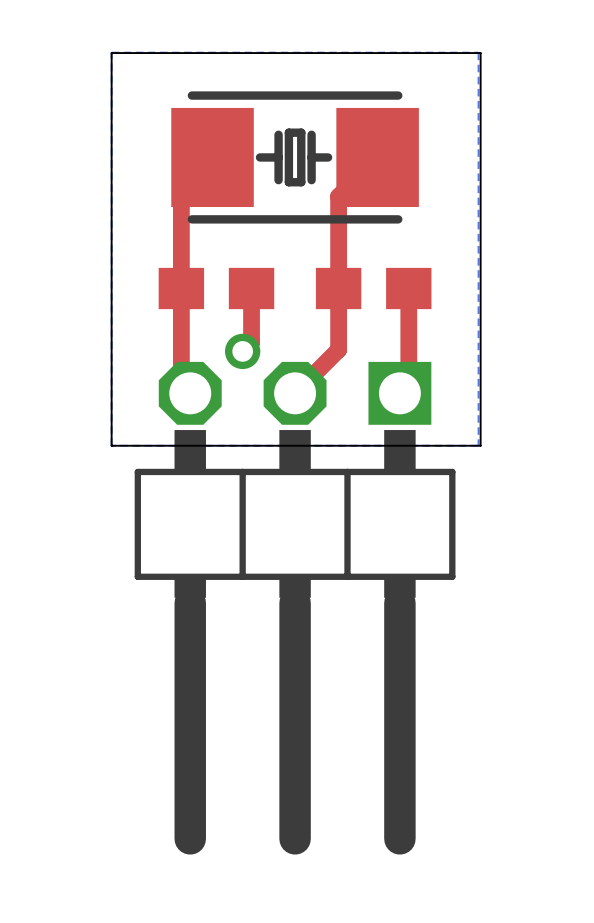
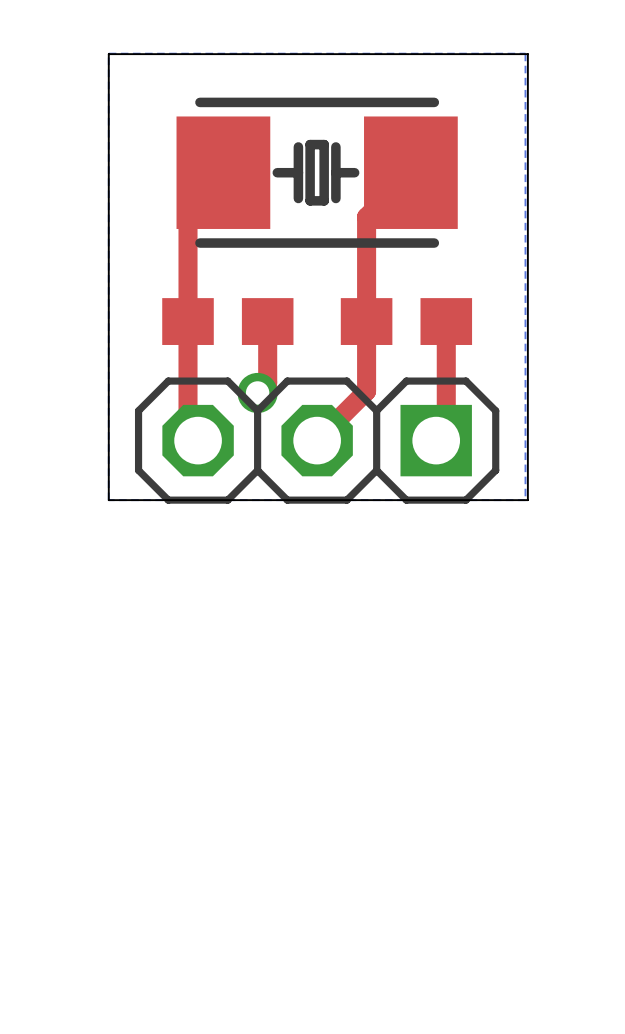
part: none -> (317, 440)
part: (295, 608) -> none

